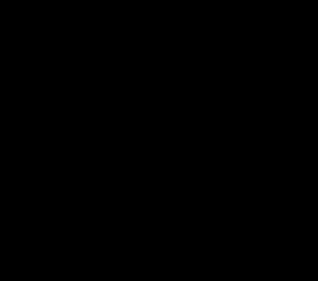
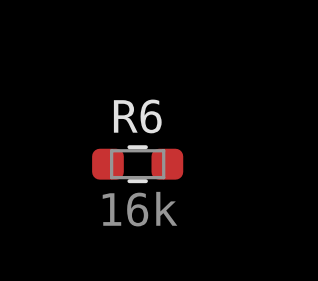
R6: none -> 16k (137, 164)

